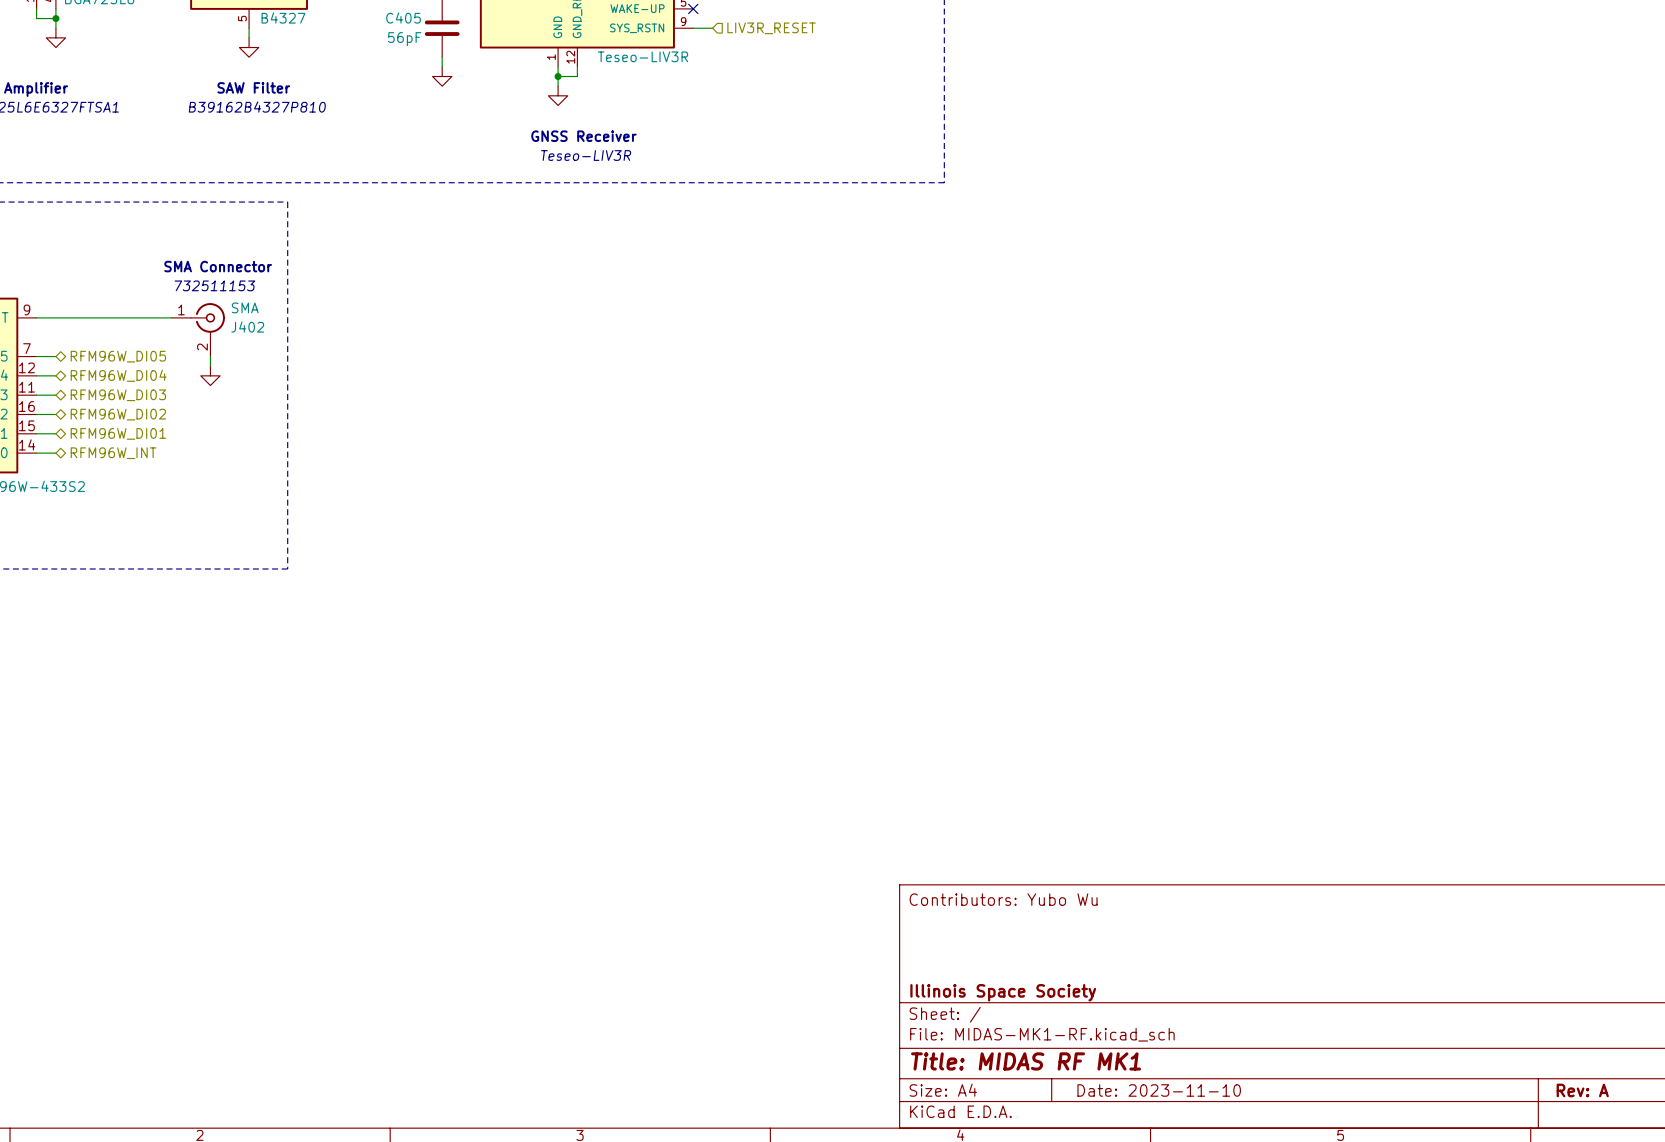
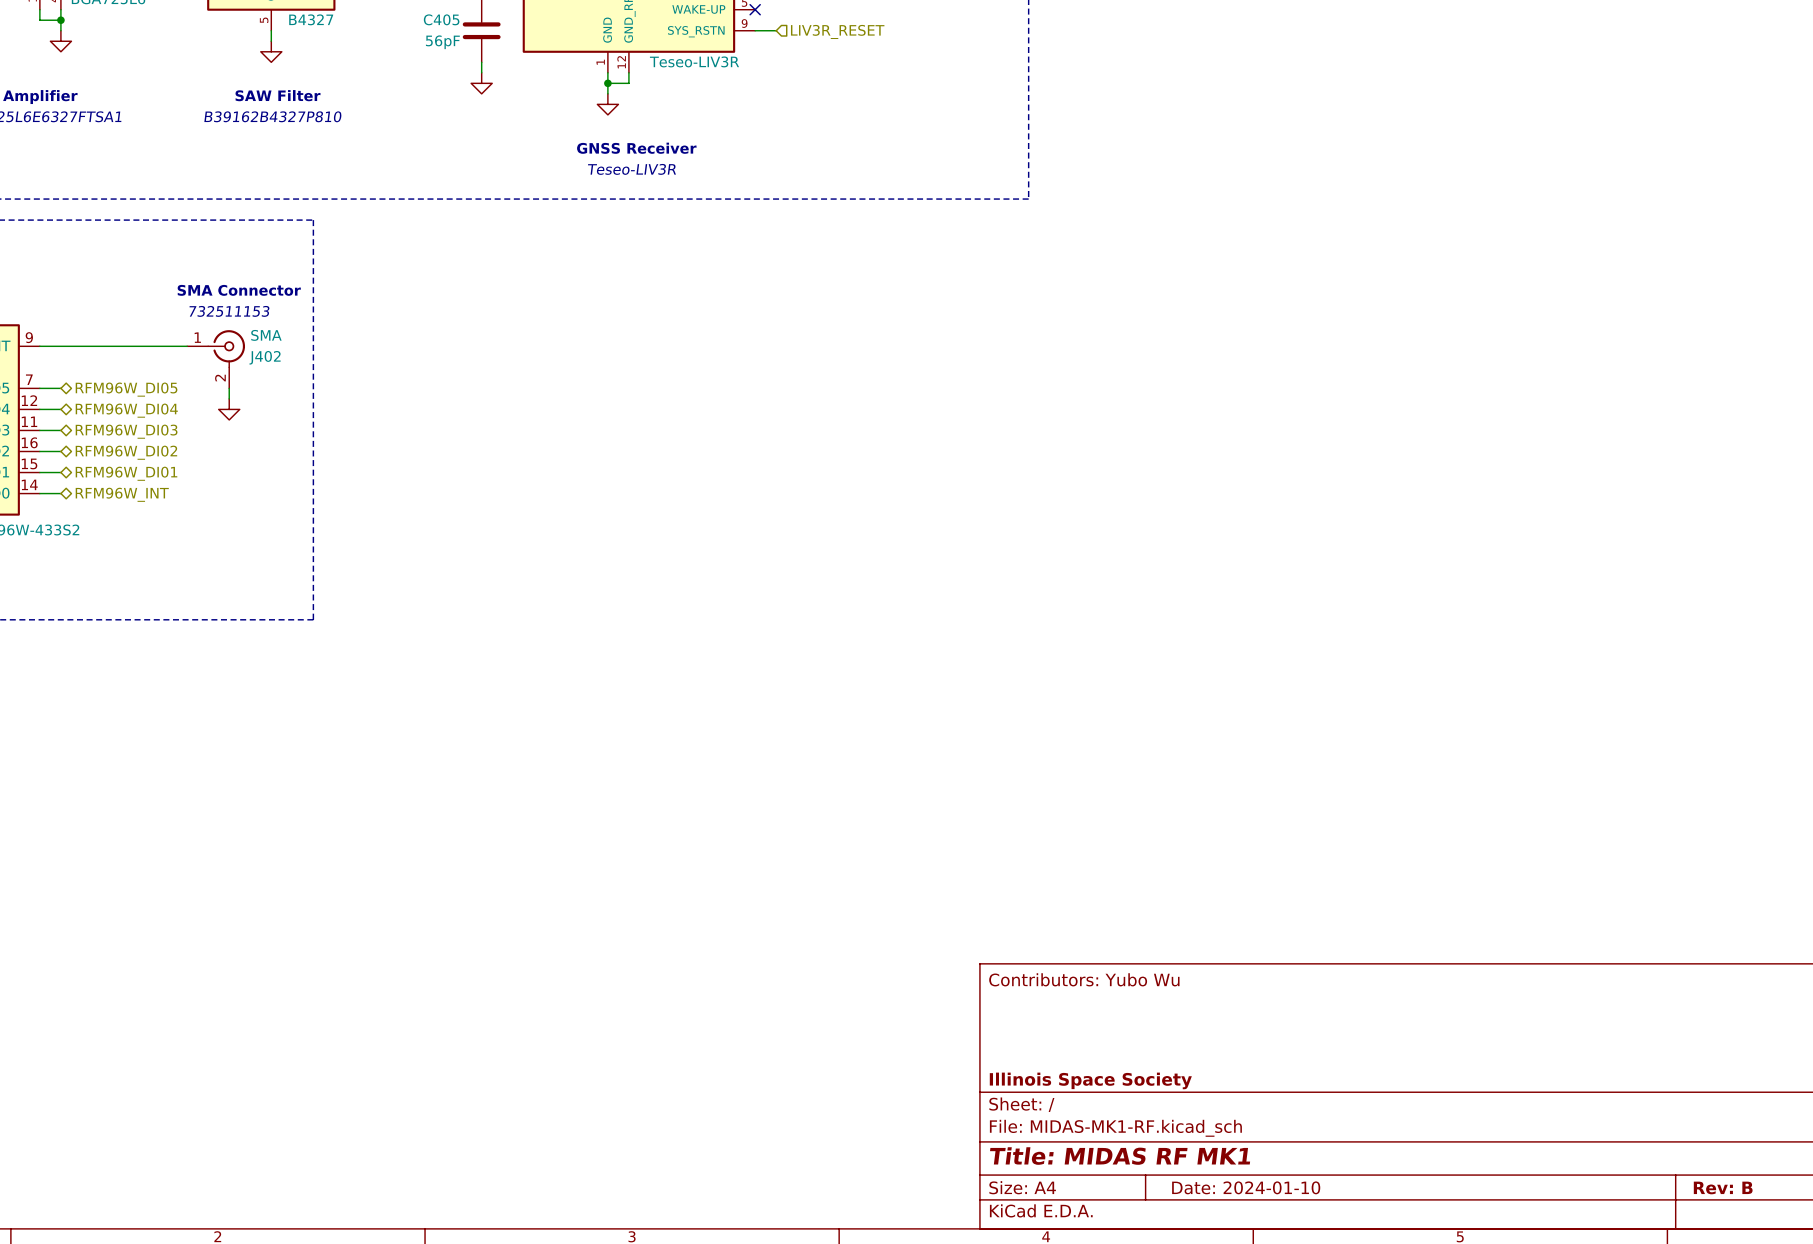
title block: Date: 2023-11-10 (1159, 1090) -> Date: 2024-01-10 (1246, 1187)
title block: Rev: A (1582, 1090) -> Rev: B (1723, 1187)

